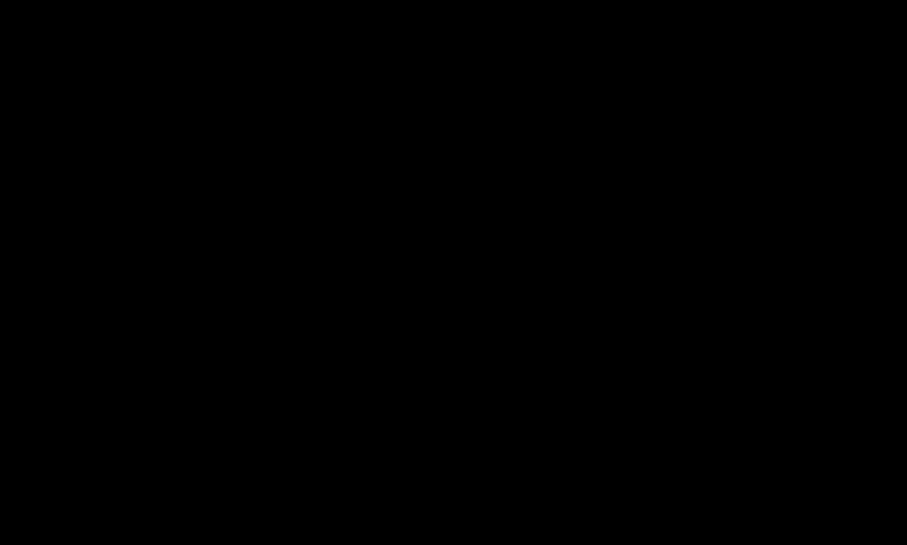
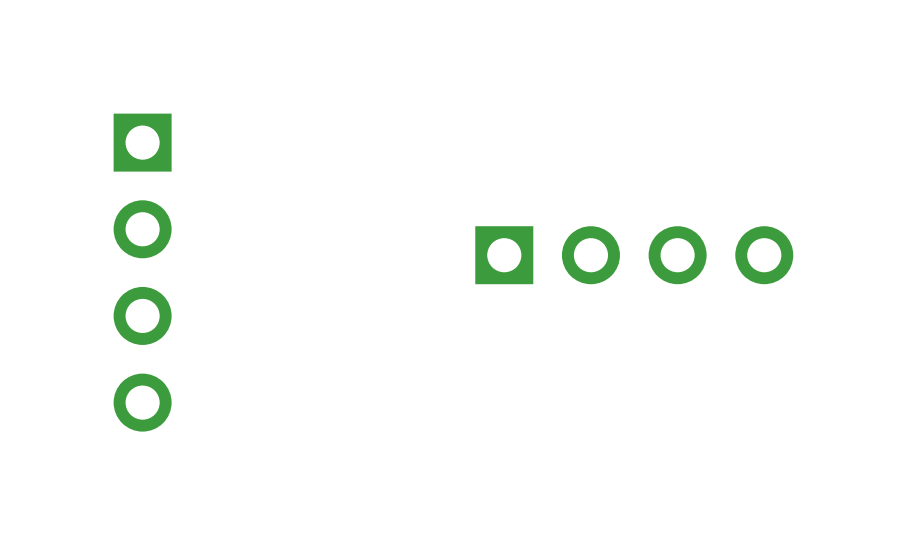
part: none -> (634, 255)
part: none -> (142, 272)

